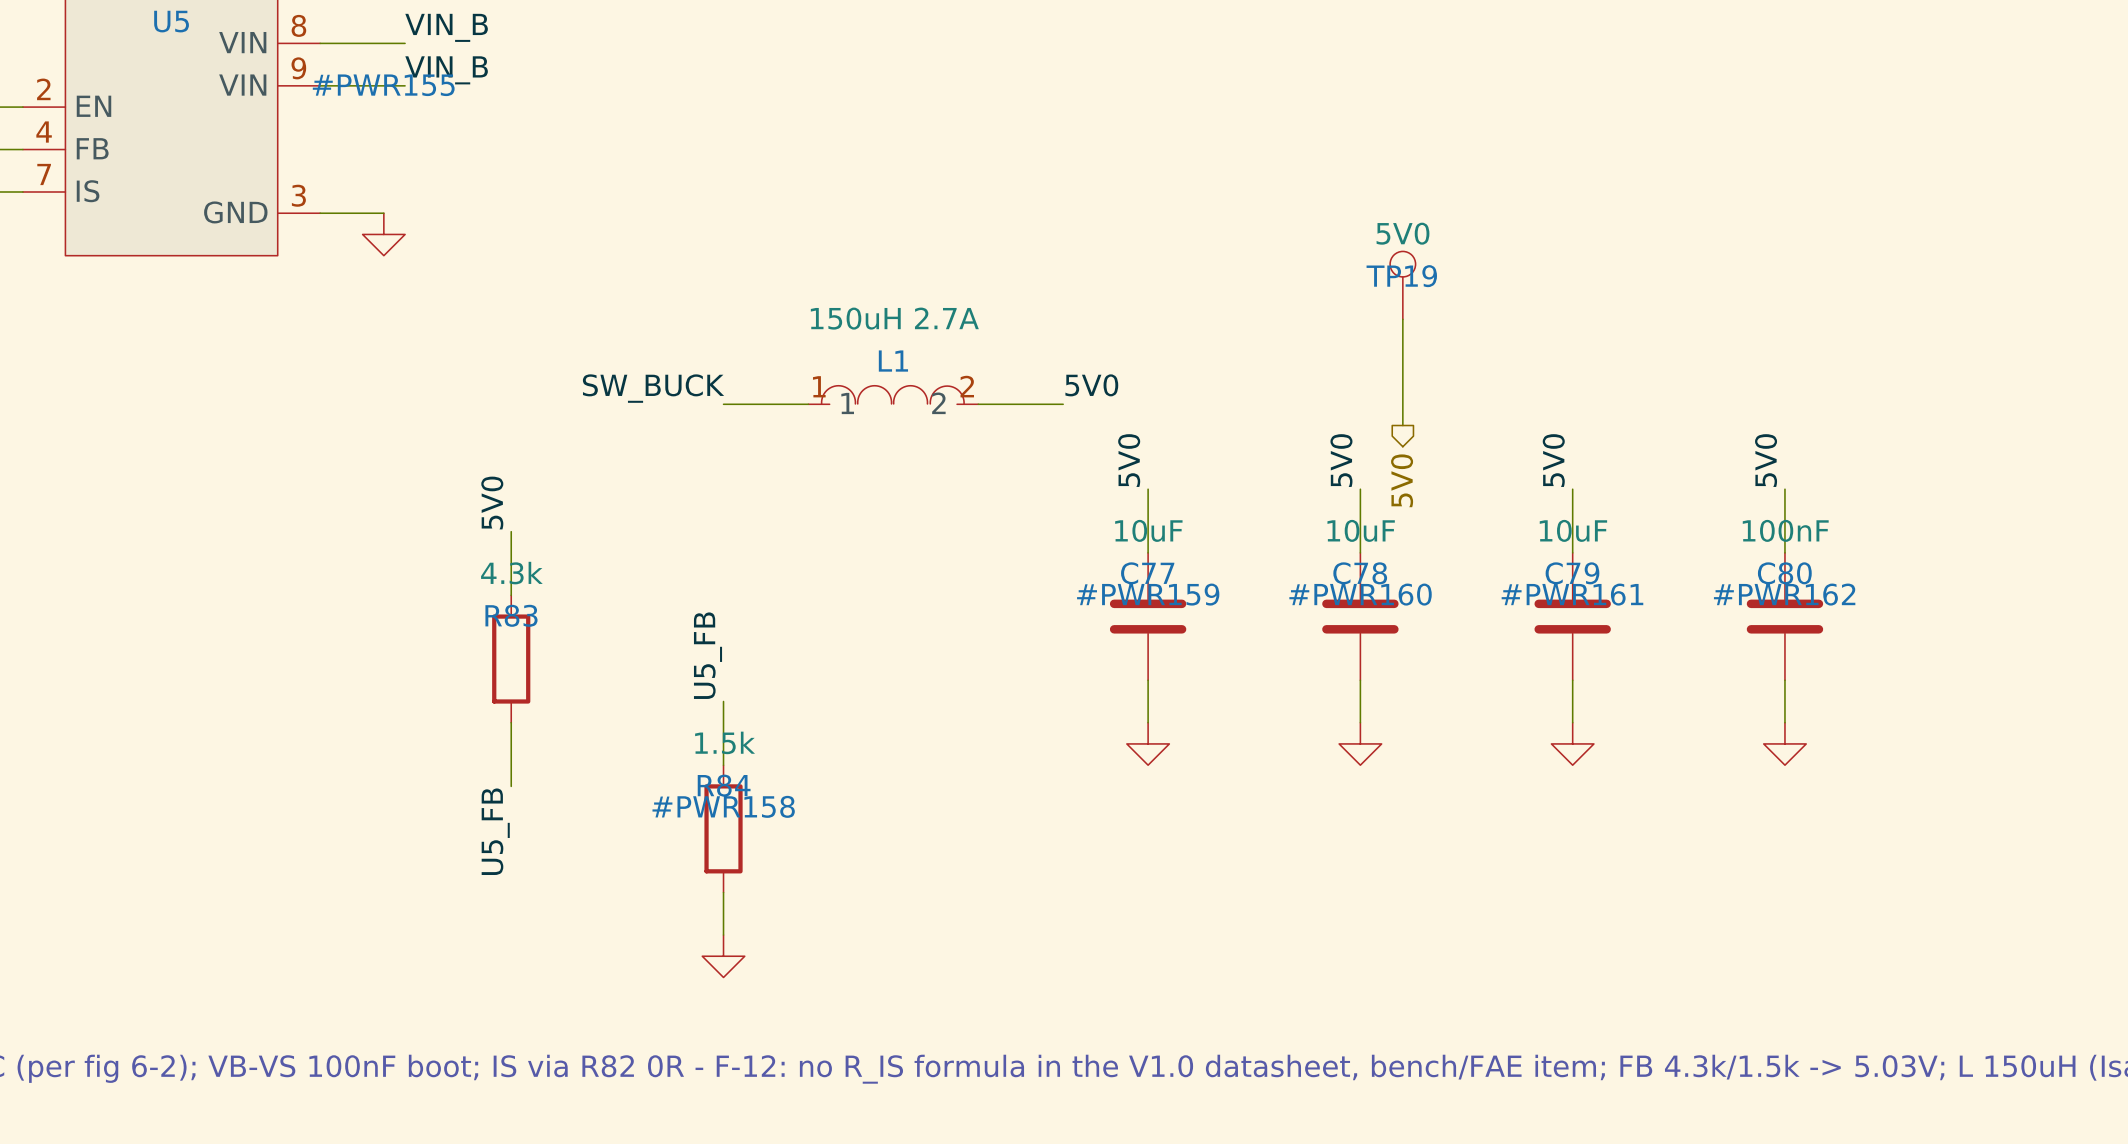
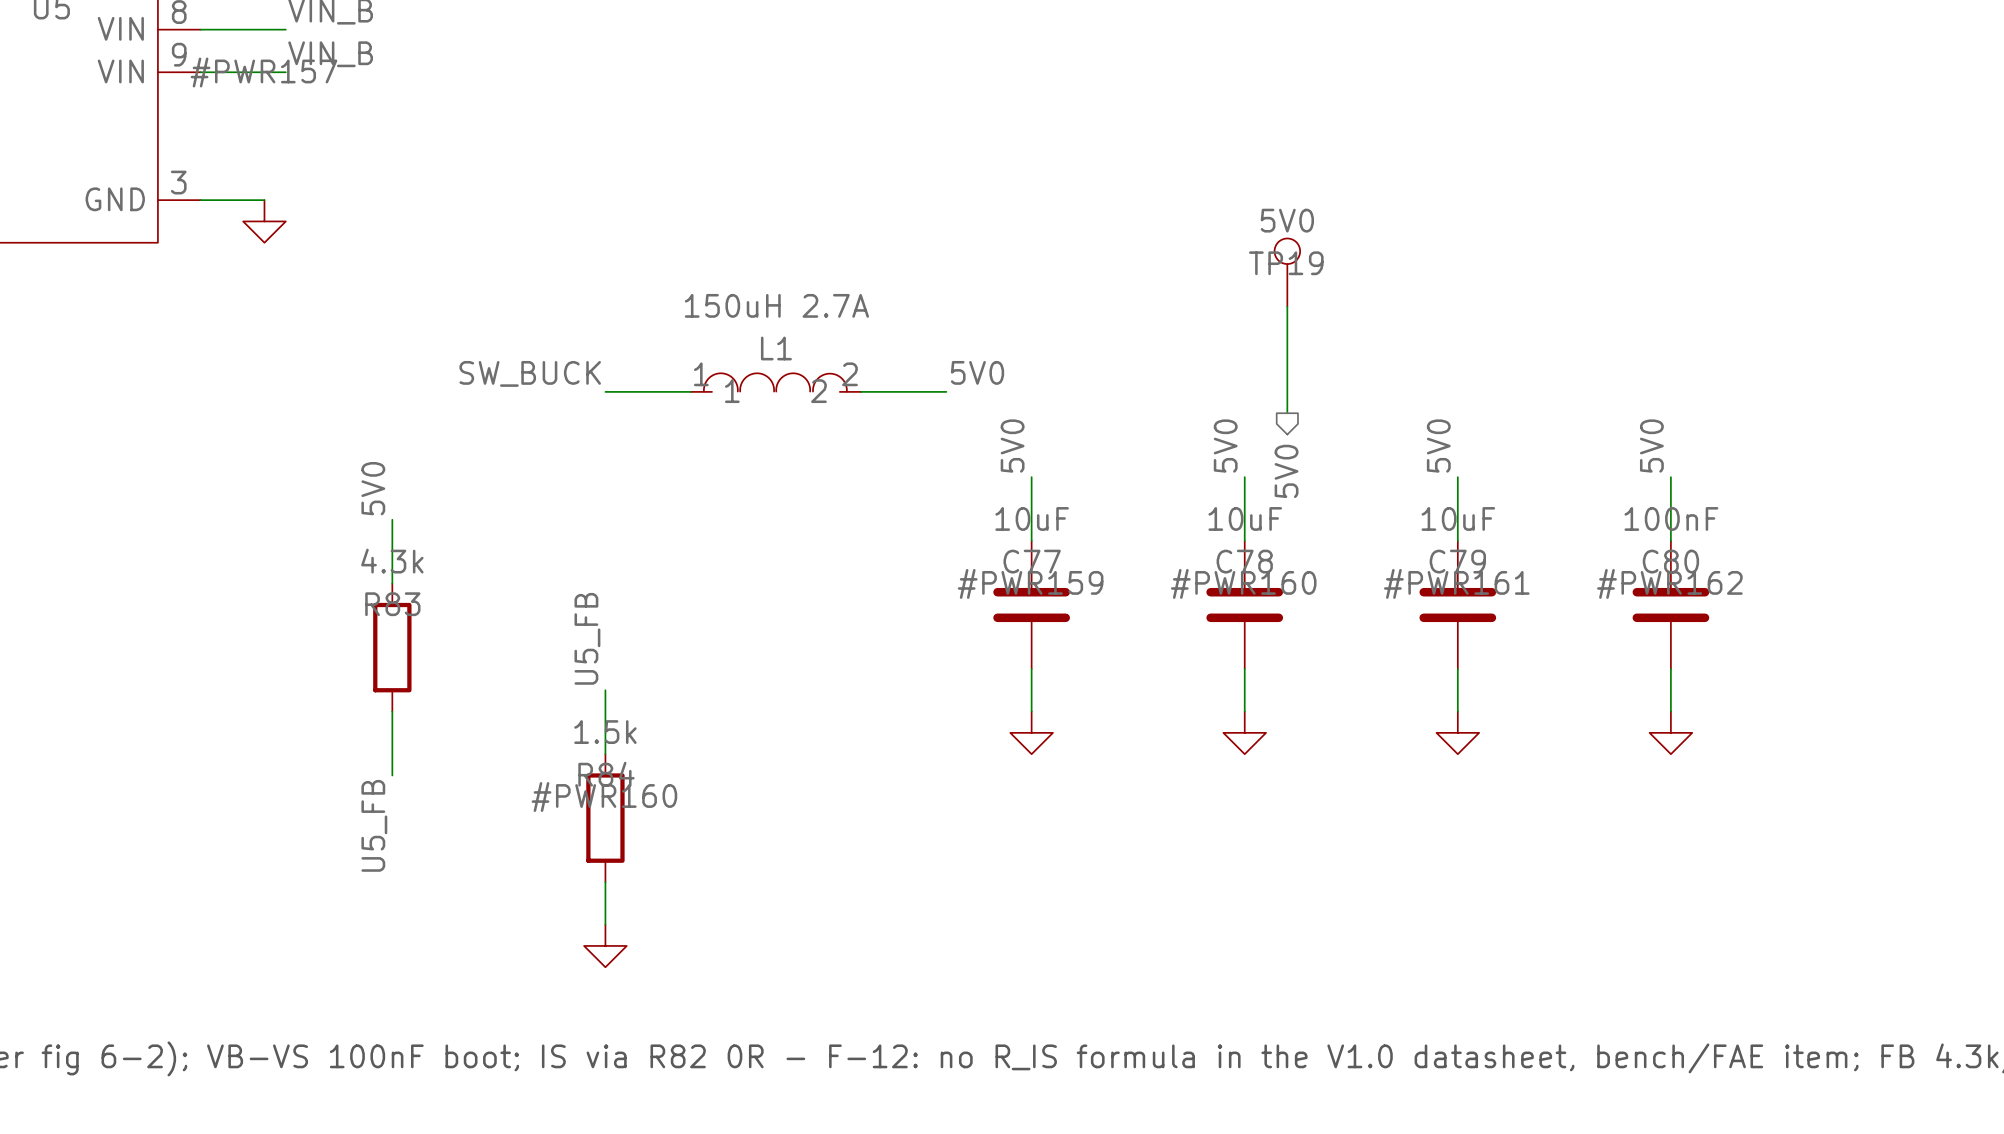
#PWR155 name: #PWR155 (383, 85) -> #PWR157 (263, 72)
#PWR158 name: #PWR158 (723, 806) -> #PWR160 (604, 797)

